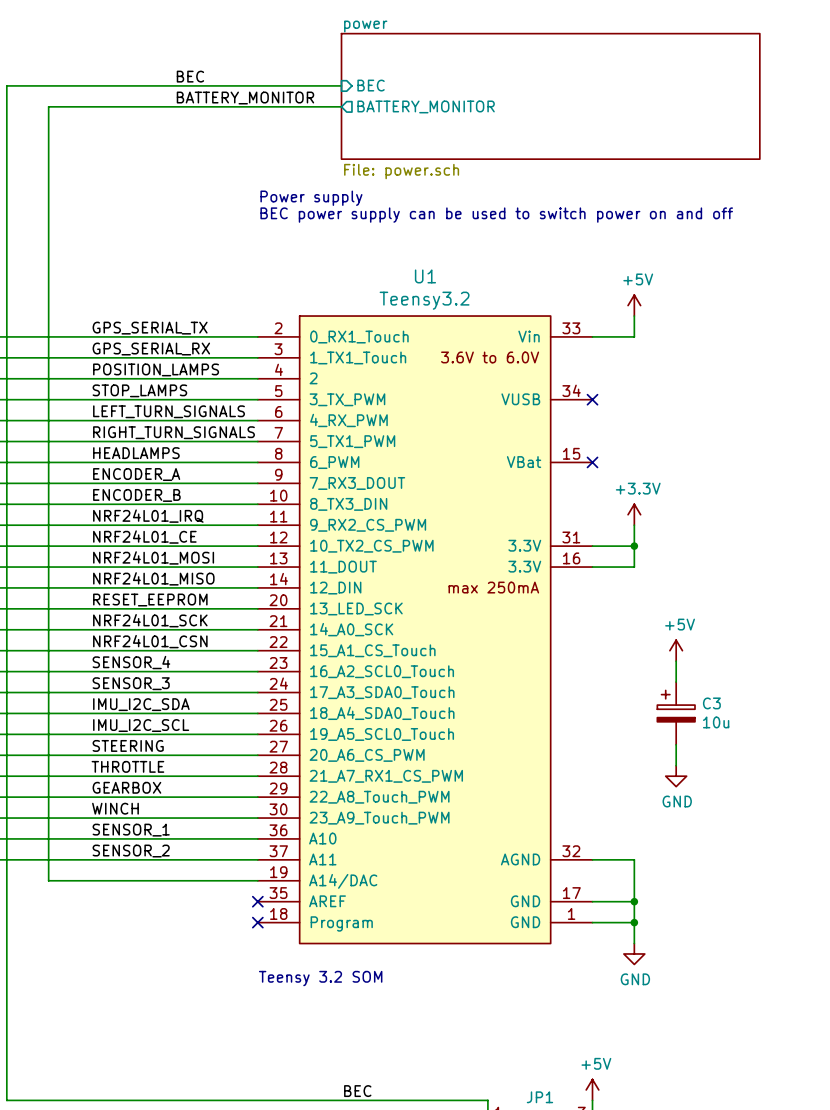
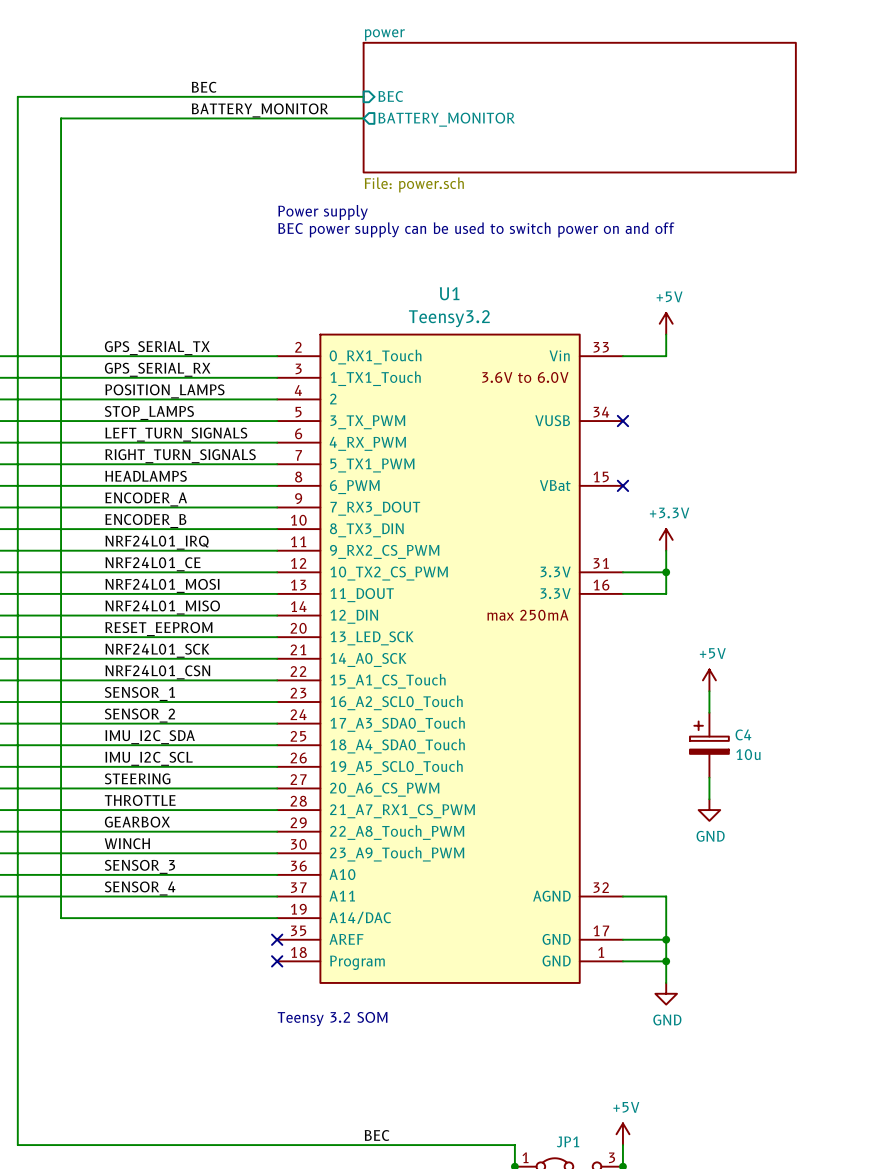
label: SENSOR_4 (131, 662) -> SENSOR_1 (139, 693)
label: SENSOR_3 (131, 683) -> SENSOR_2 (139, 715)
C3 name: C3 (711, 703) -> C4 (743, 734)
label: SENSOR_1 (131, 830) -> SENSOR_3 (139, 866)
label: SENSOR_2 (131, 851) -> SENSOR_4 (140, 888)

